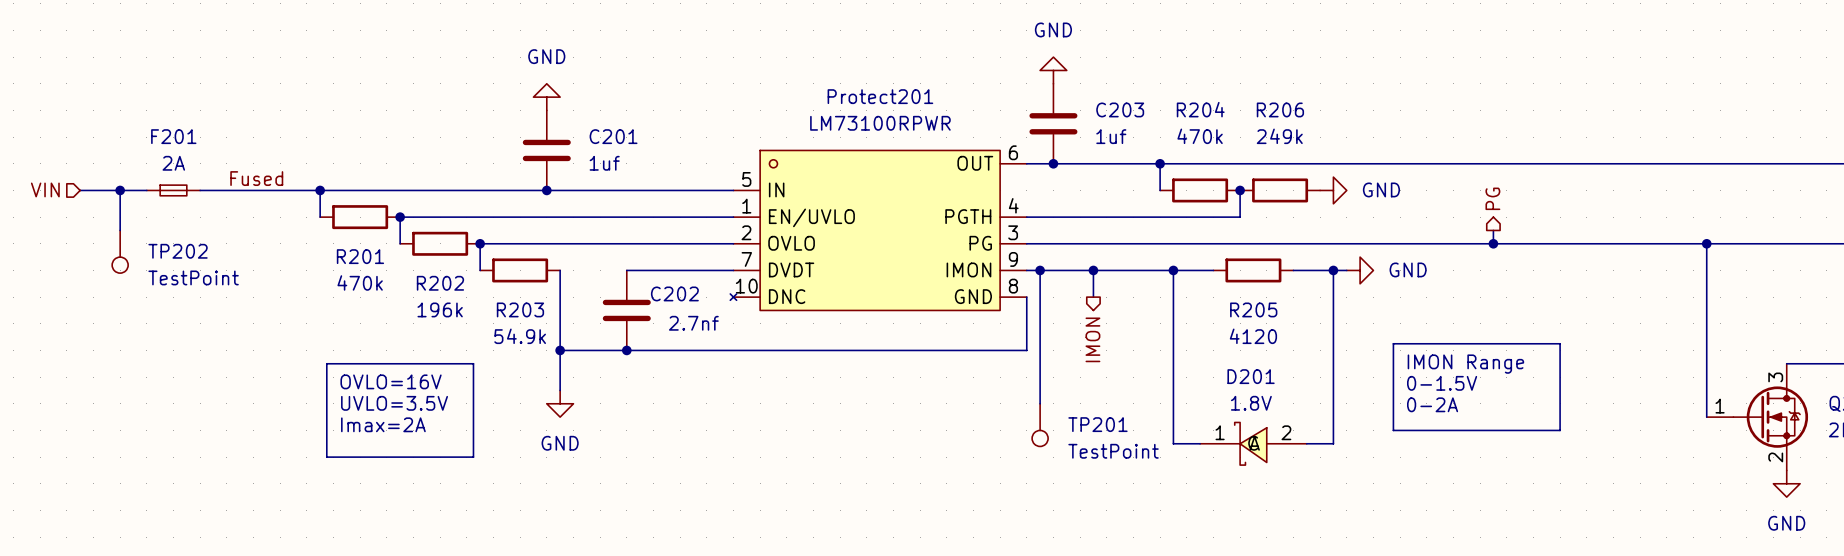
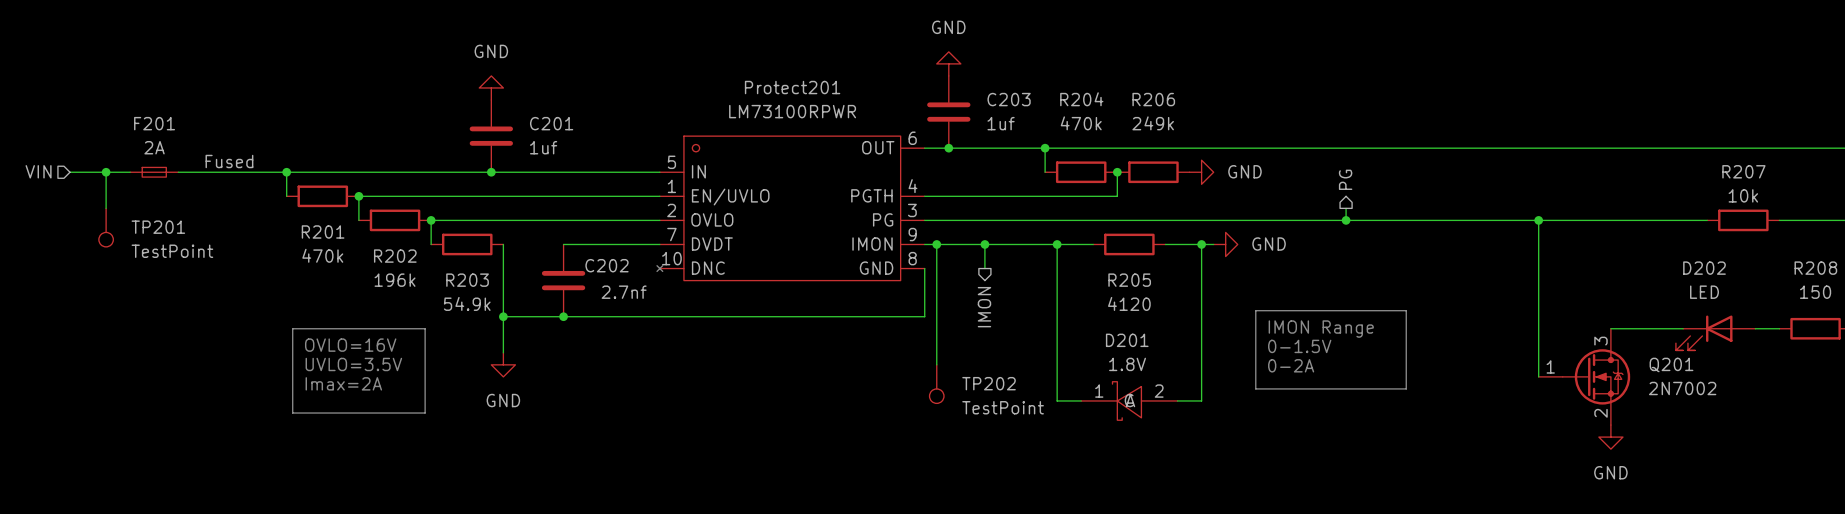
TP202 name: TP202 (178, 251) -> TP201 (158, 227)
TP201 name: TP201 (1097, 424) -> TP202 (989, 383)

